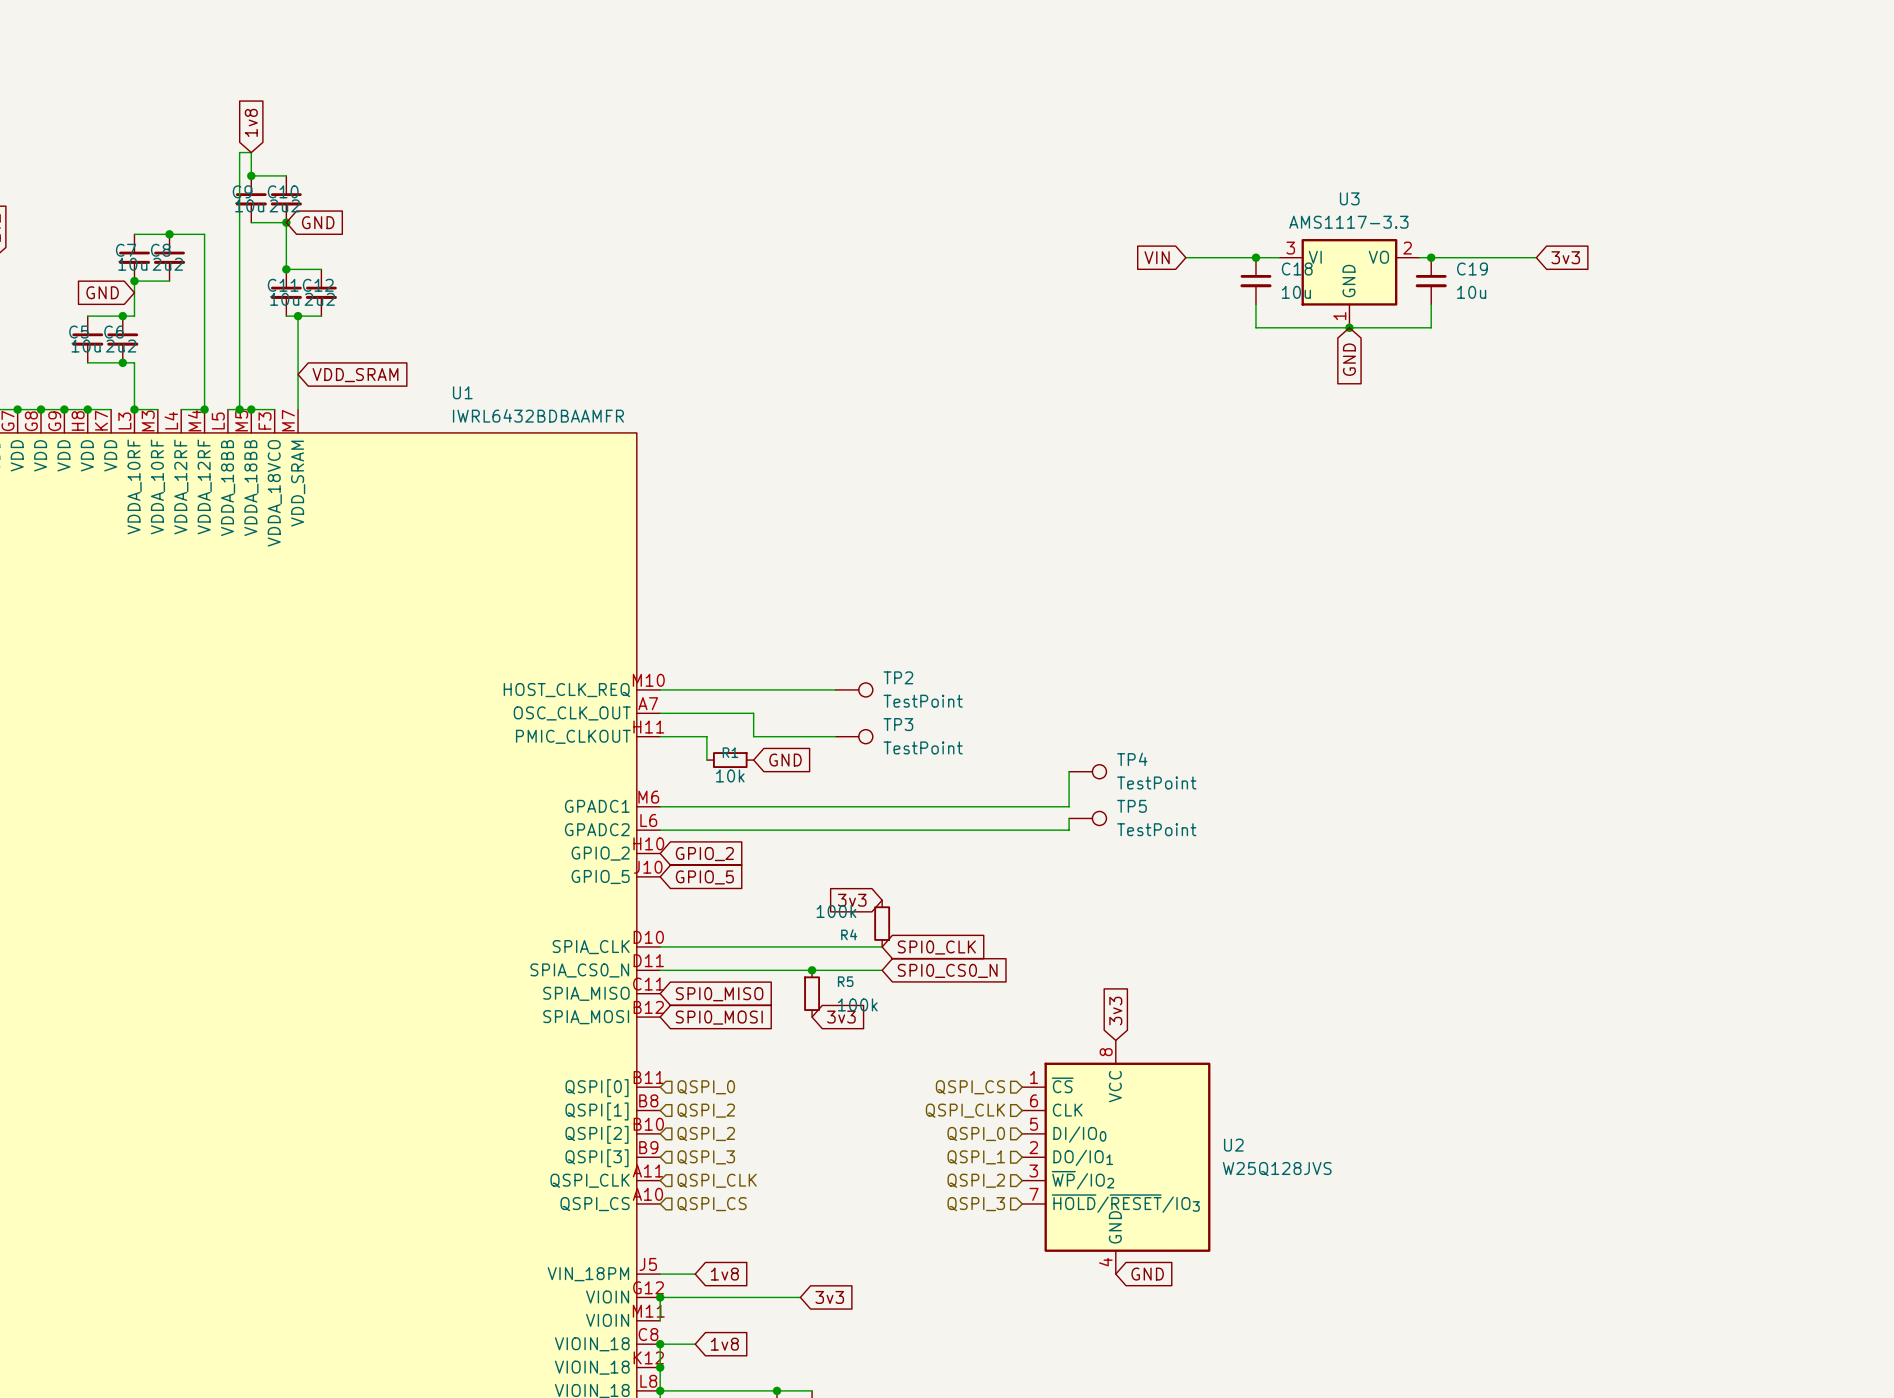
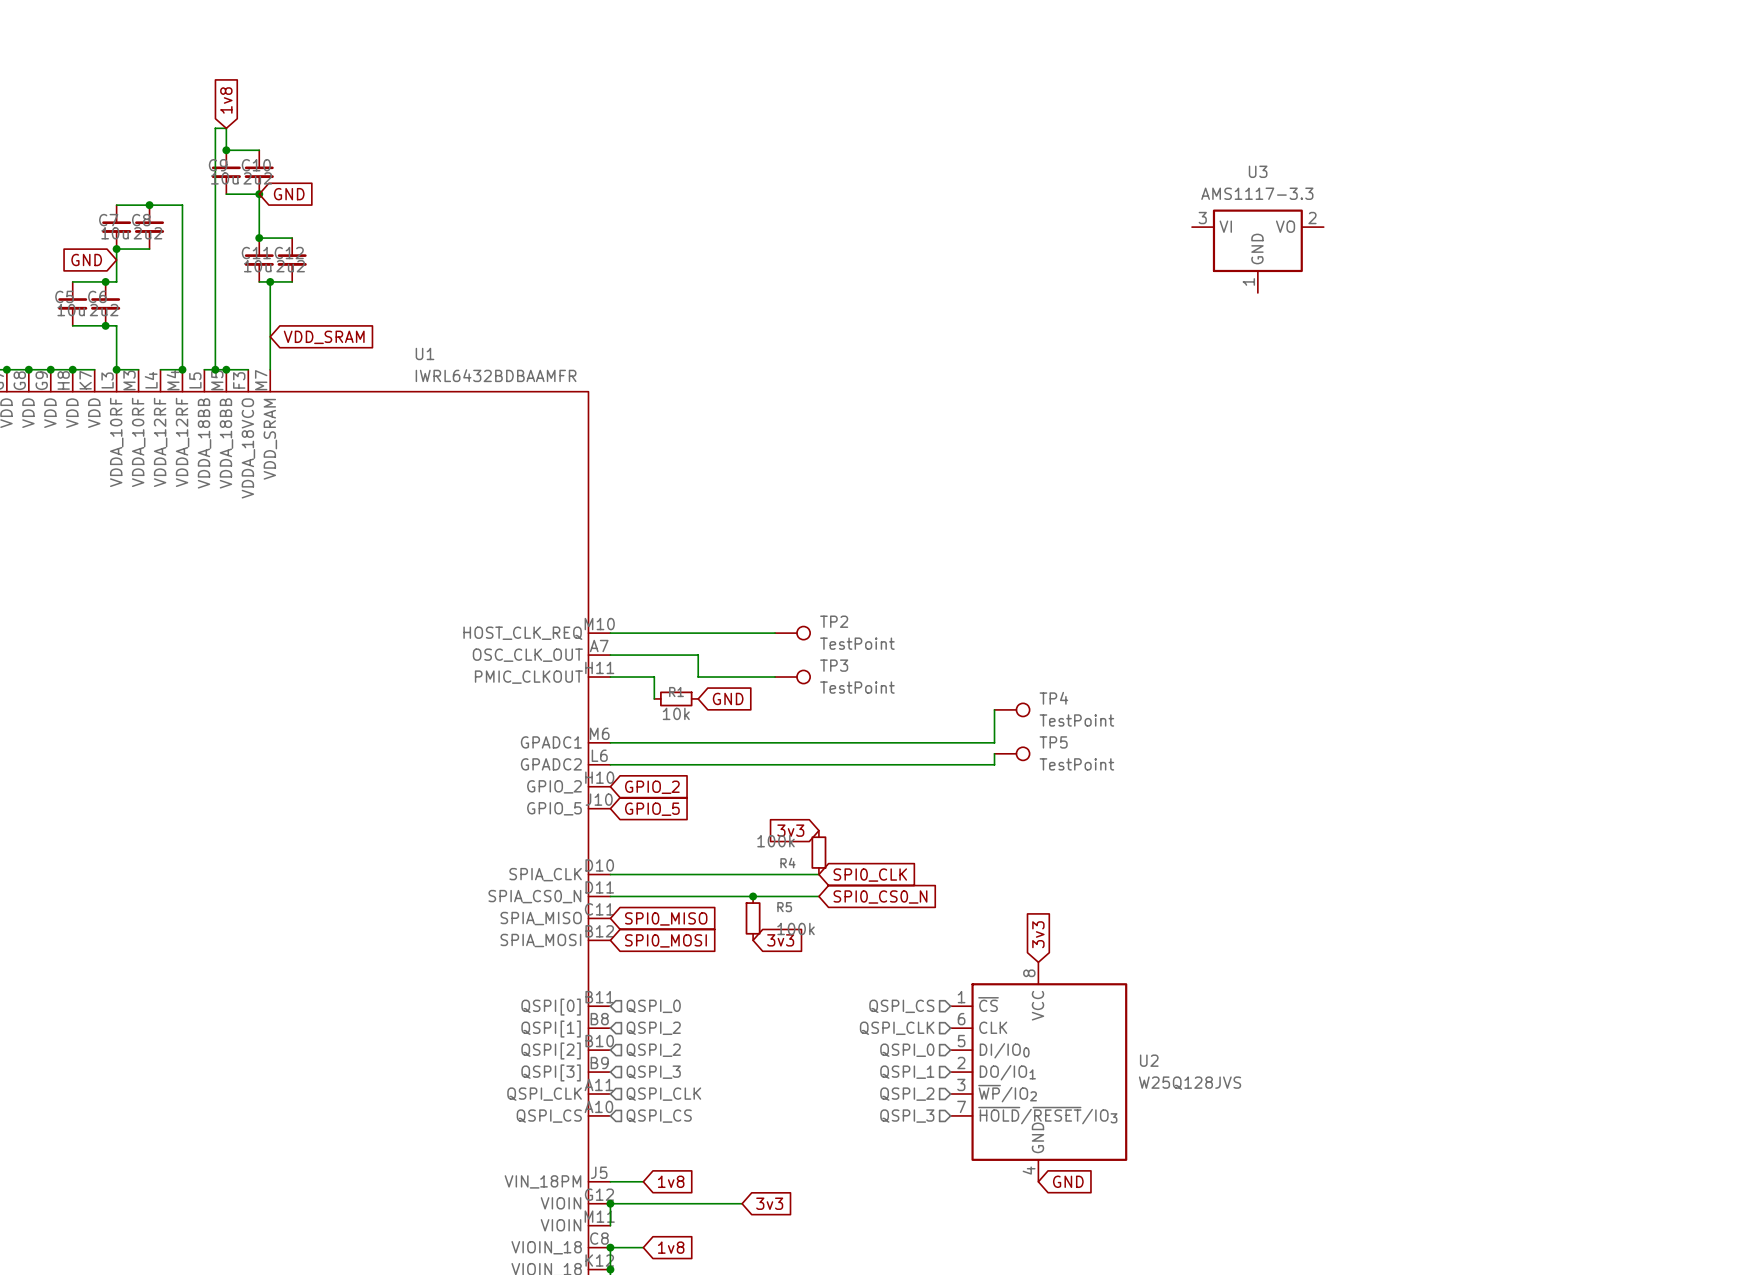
global label: VIN (1157, 257) -> none
wire: (1185, 257) (1279, 257) -> none
junction: (1255, 257) -> none
wire: (1419, 257) (1536, 257) -> none
junction: (1431, 257) -> none
global label: 3v3 (1565, 257) -> none
C18: 10u (1255, 281) -> none
C19: 10u (1431, 281) -> none
wire: (1255, 304) (1255, 327) (1431, 327) (1431, 304) -> none
junction: (1349, 327) -> none
global label: GND (1349, 359) -> none

